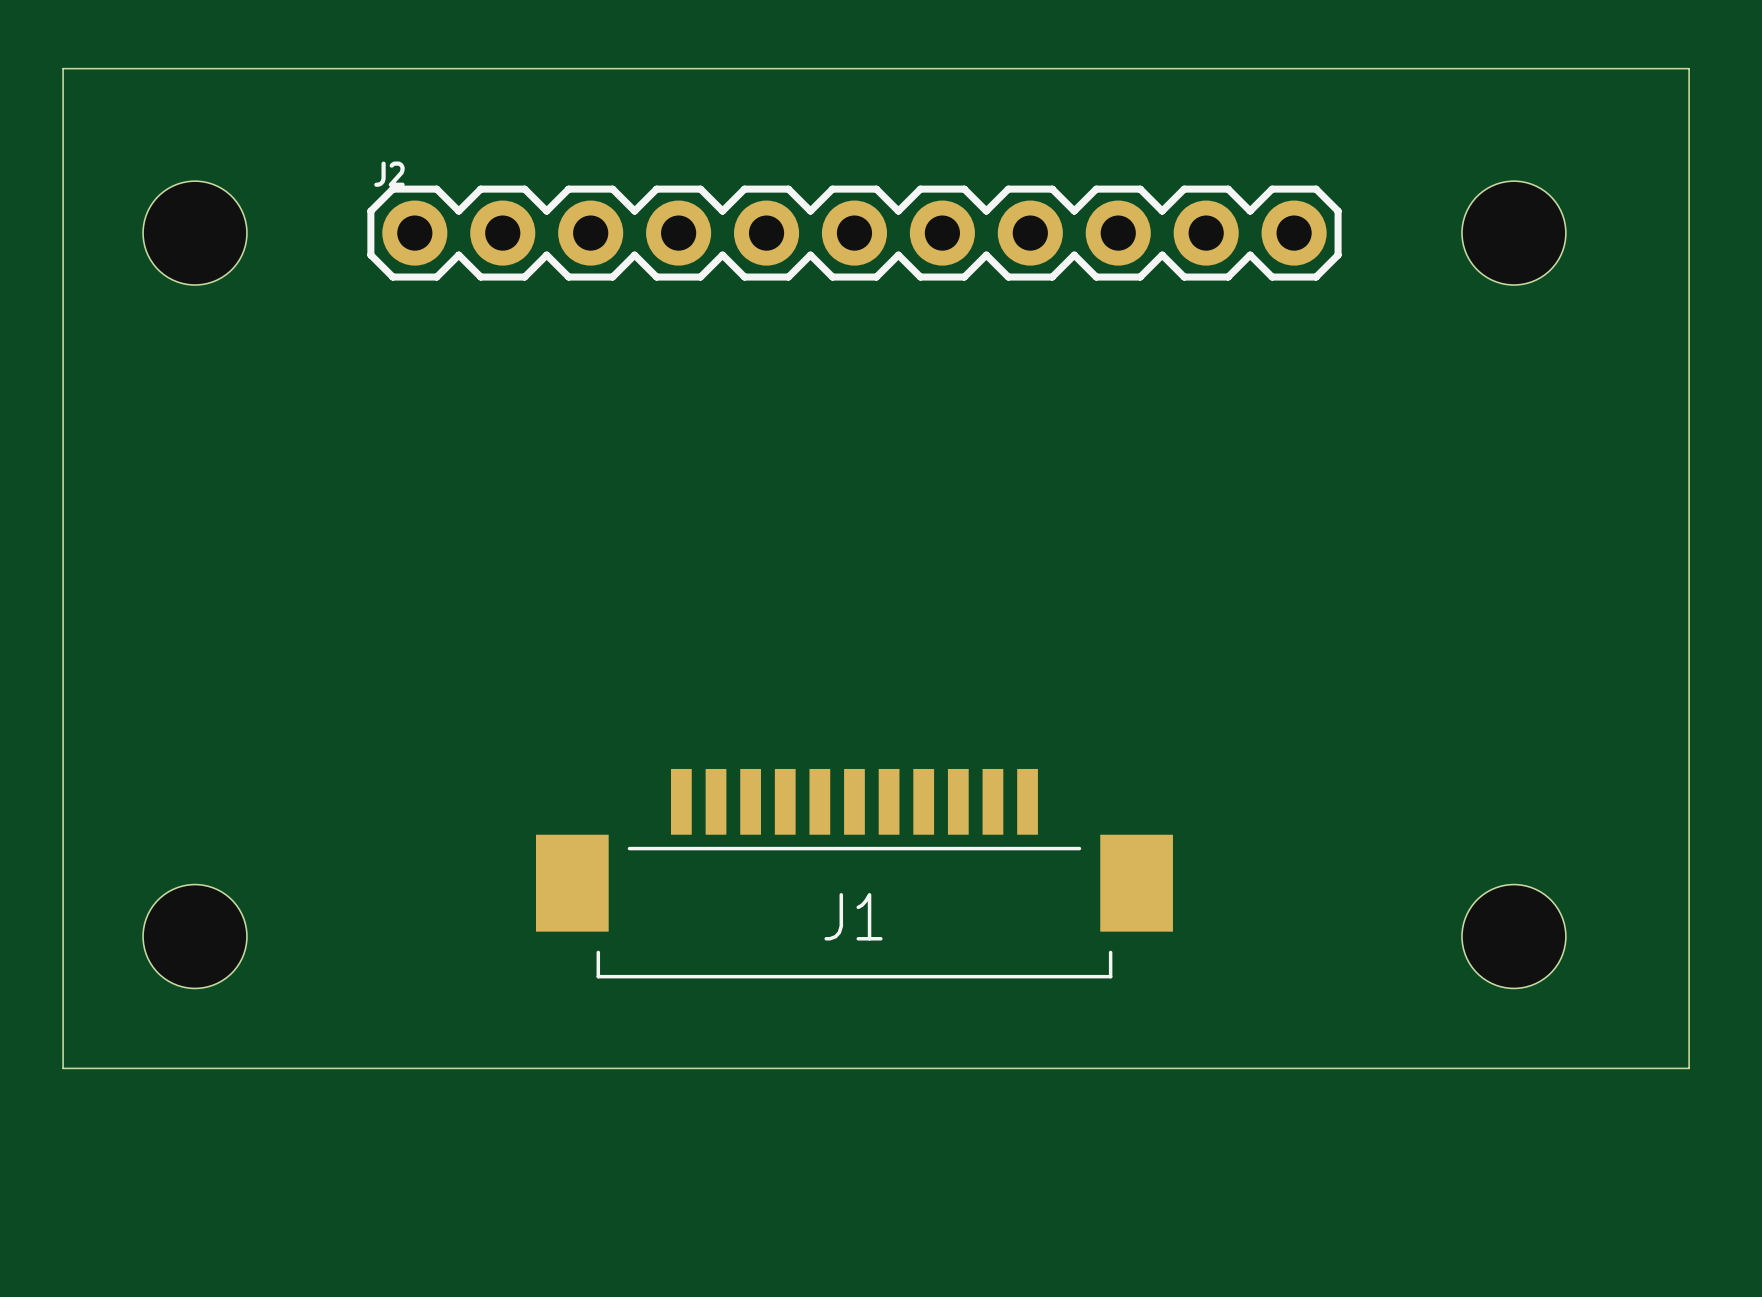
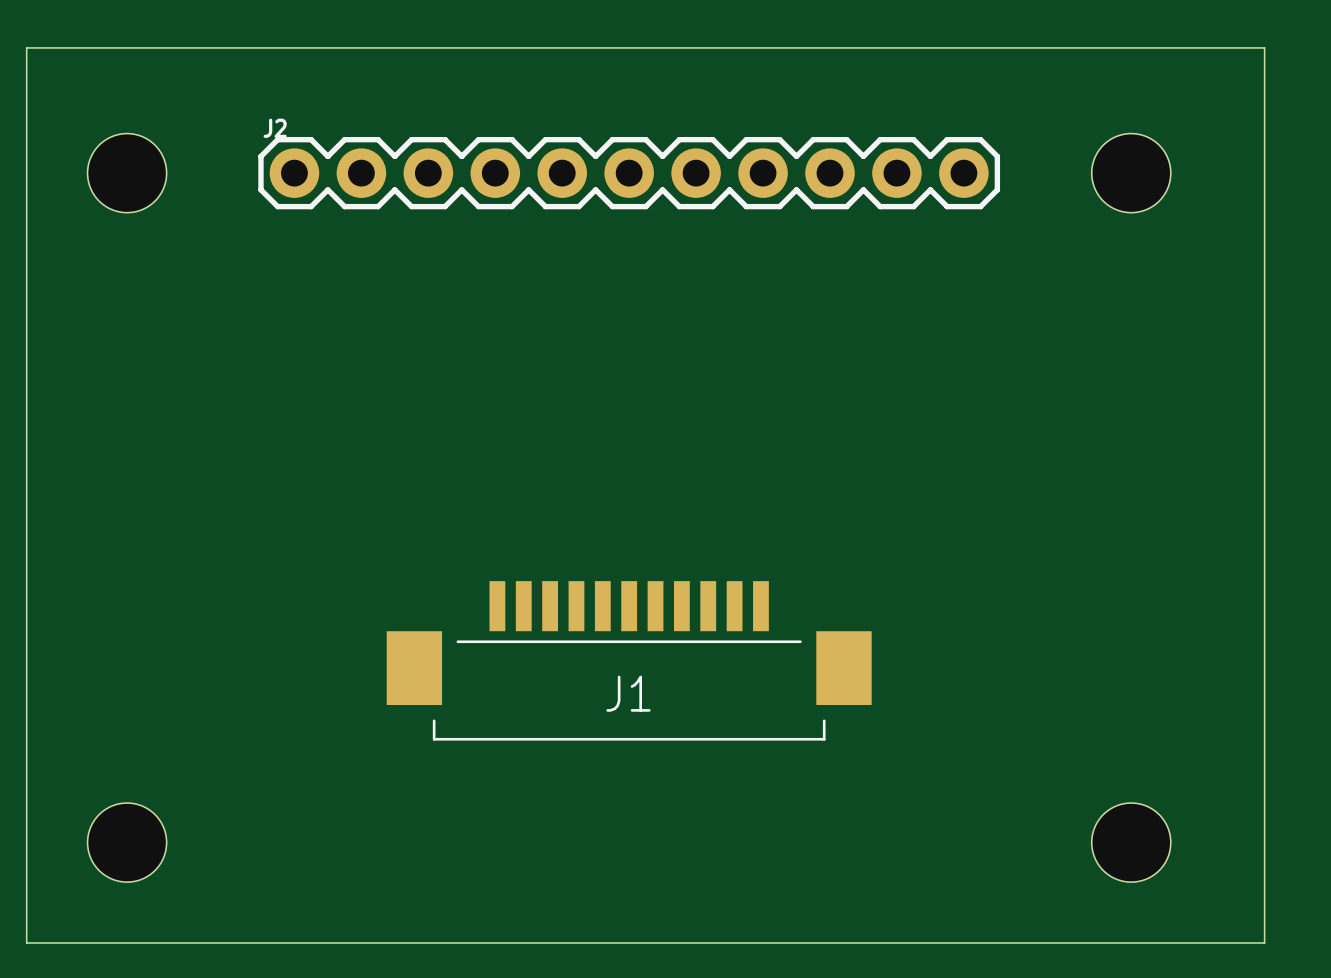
hole position: (195, 936) -> (127, 842)
hole position: (1513, 936) -> (1131, 842)
board edge: (63, 1068) (1689, 1068) -> (26, 809) (26, 942) (1264, 942) (1264, 809)

